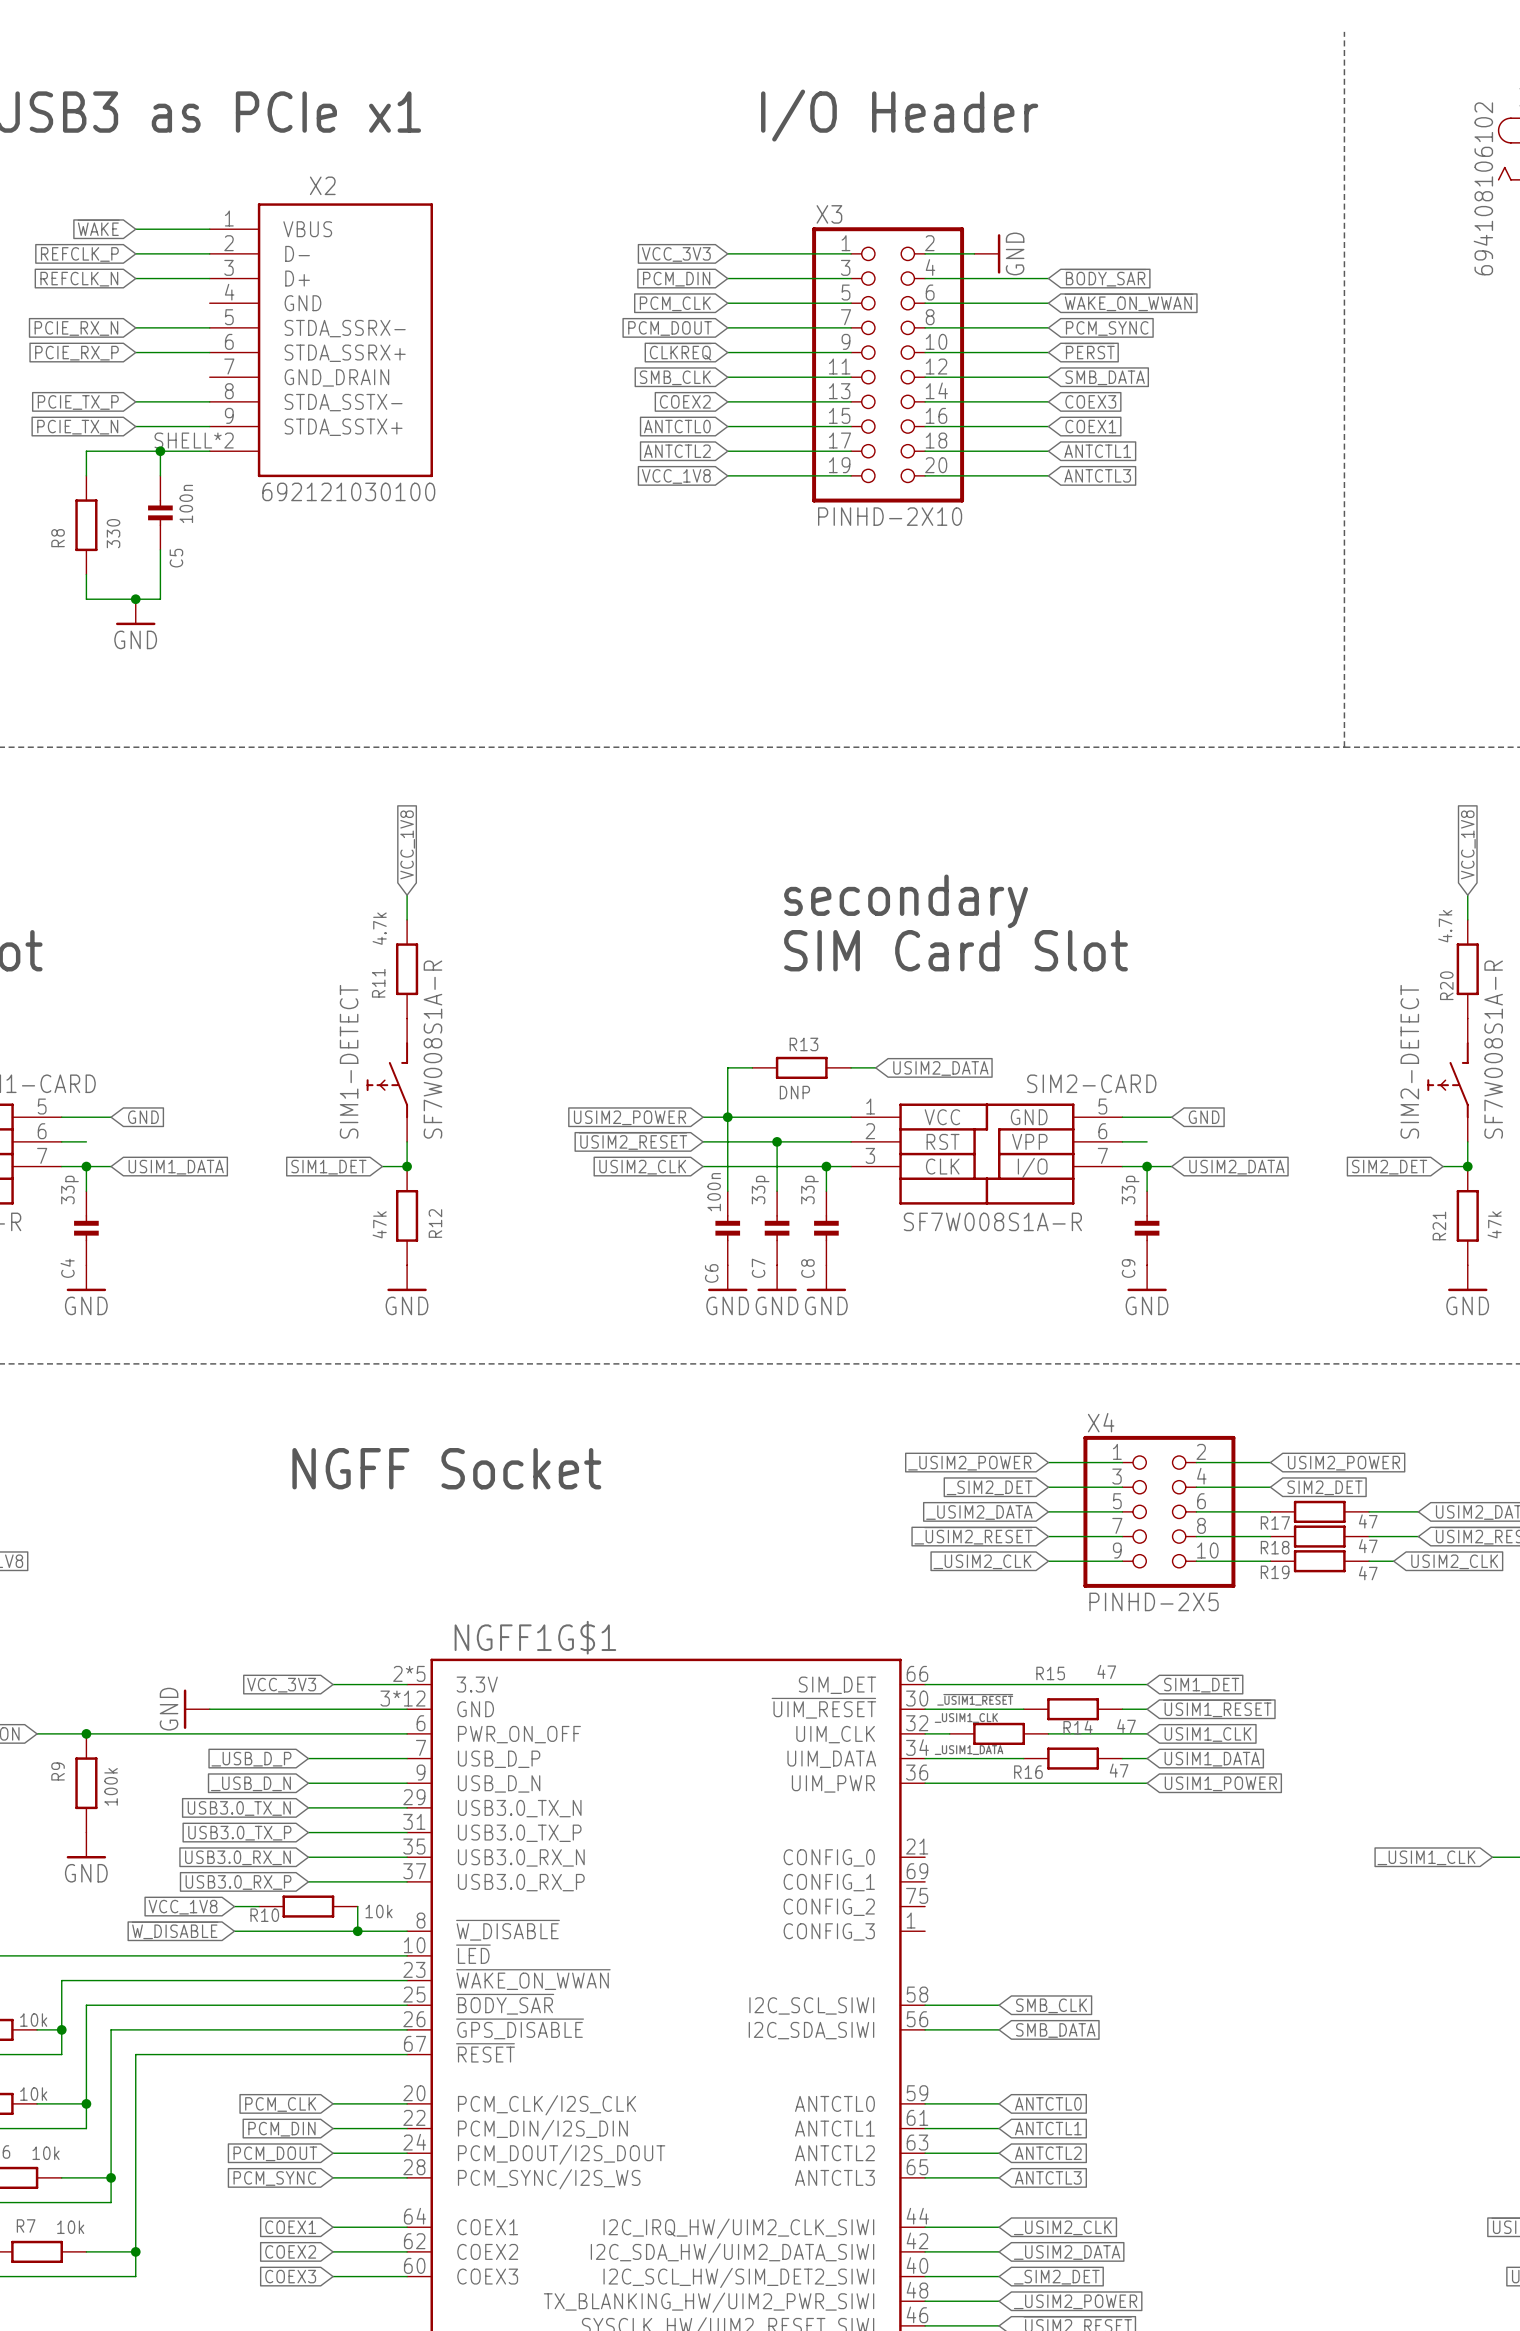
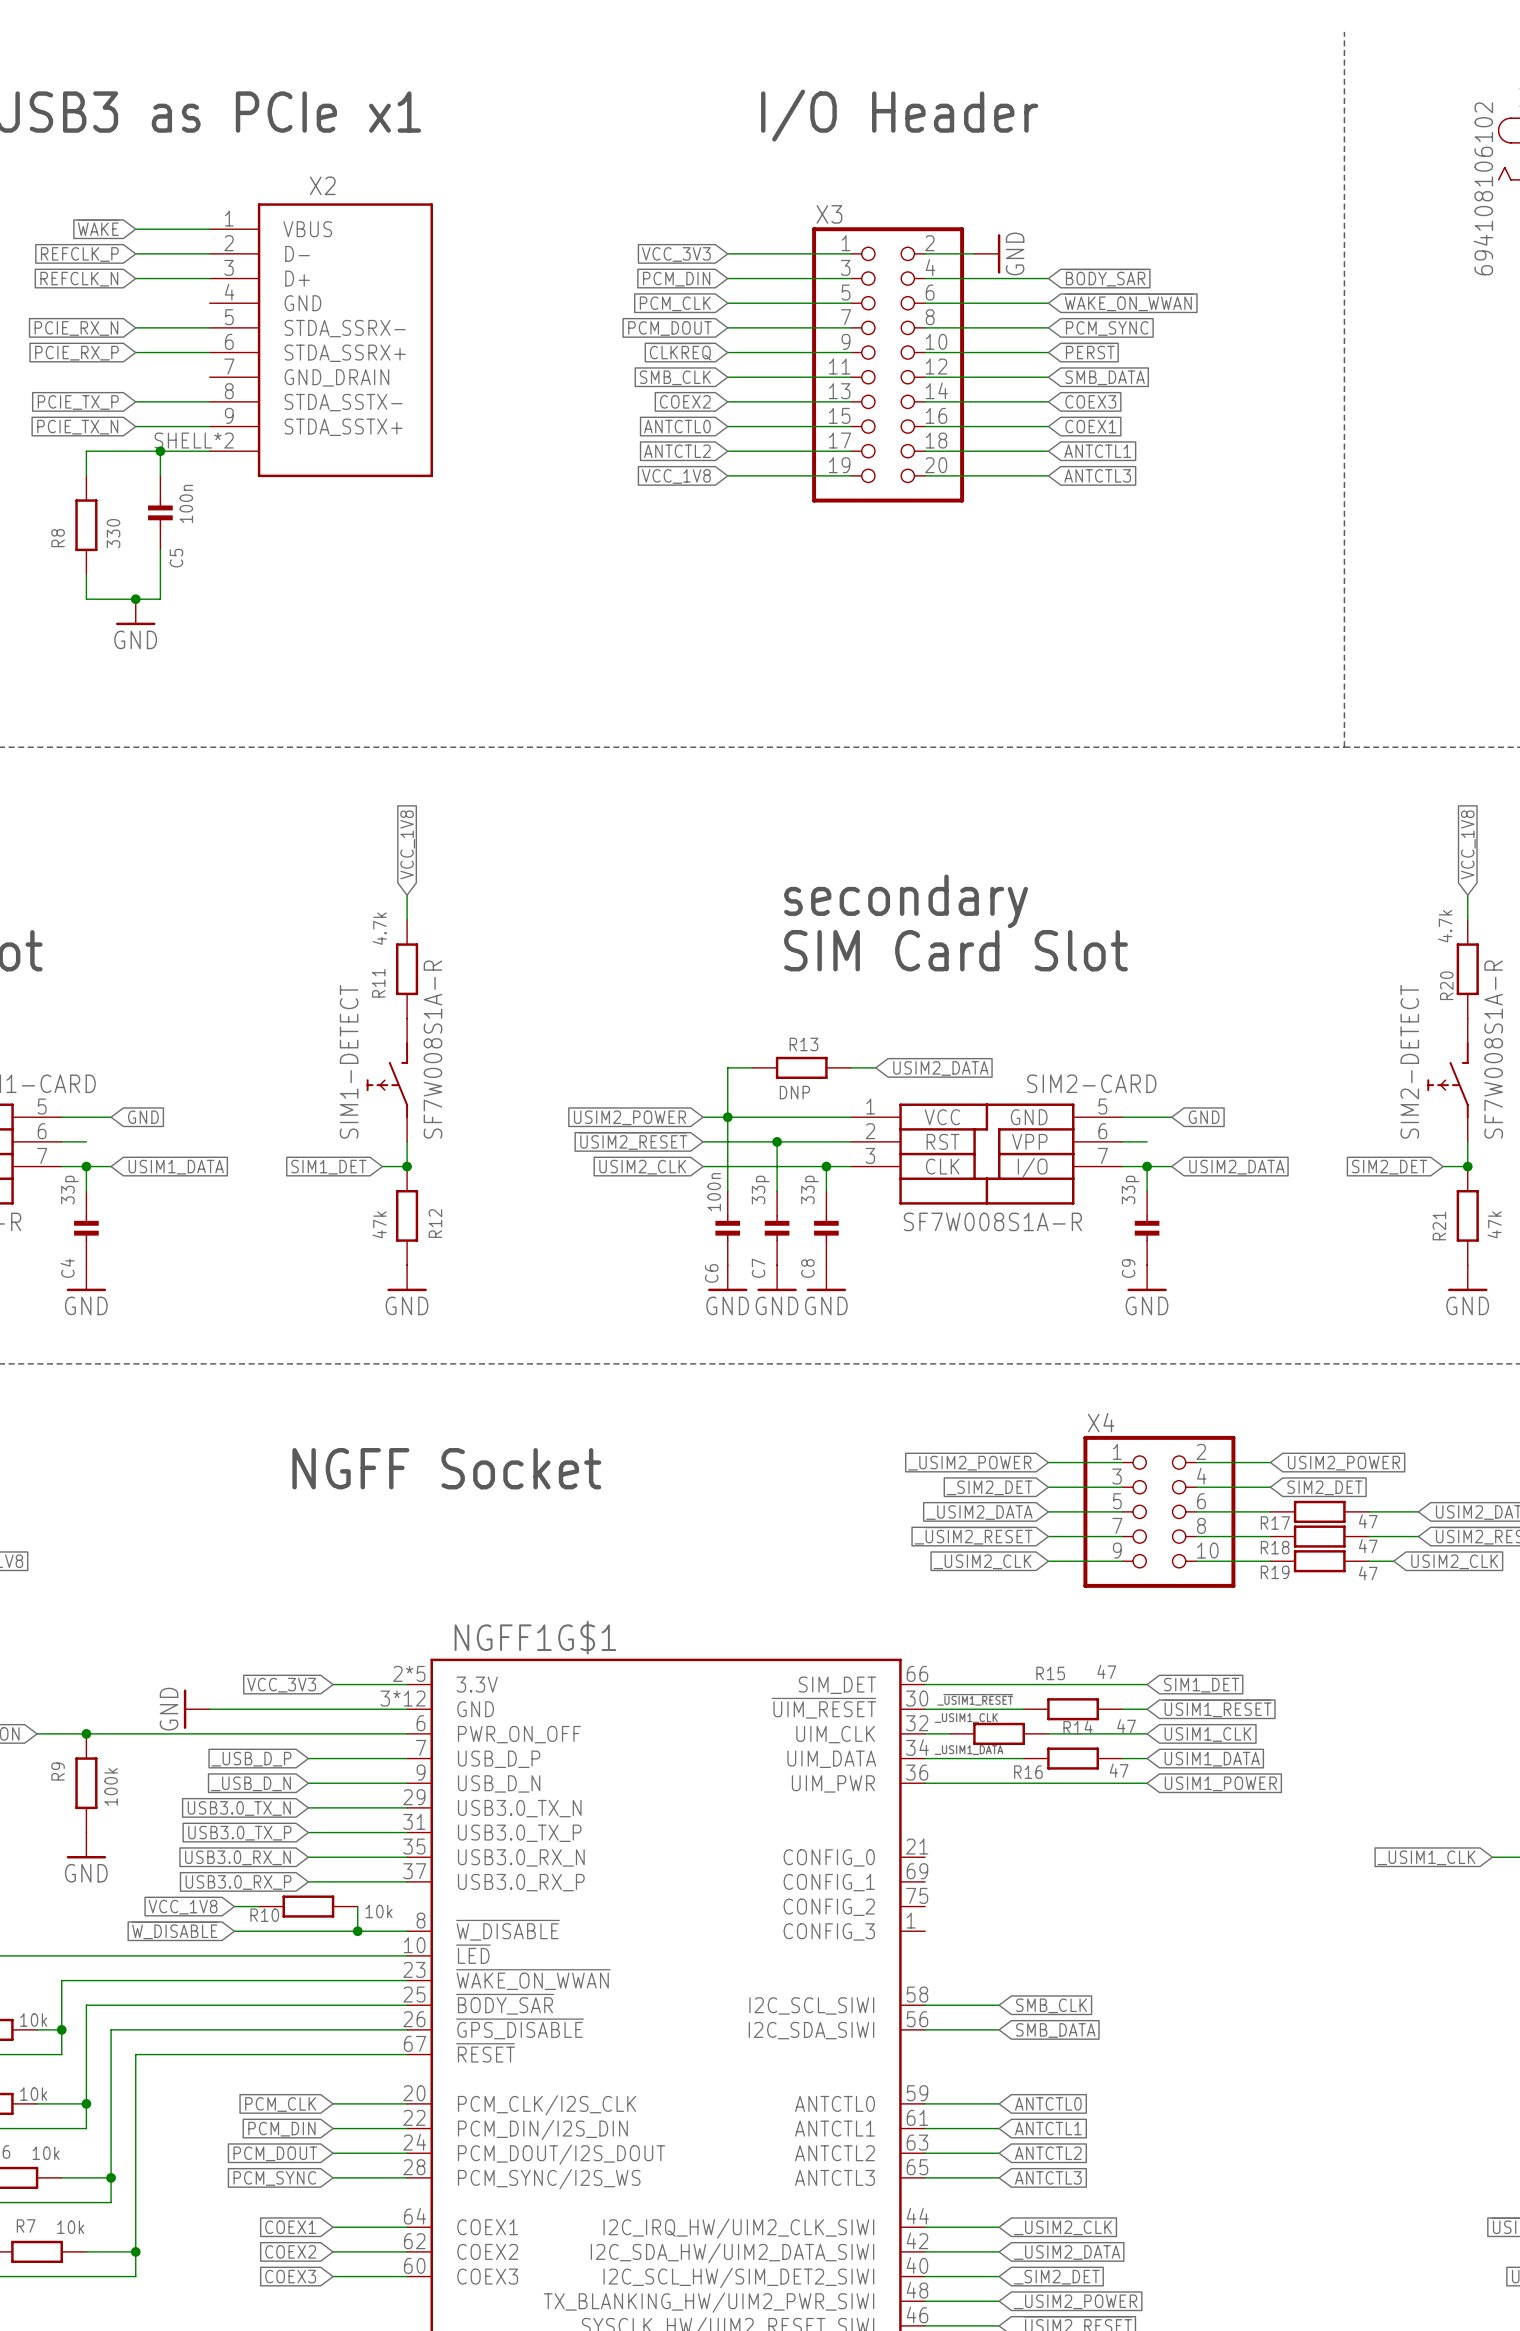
X2 value: 692121030100 (348, 491) -> none
X3 value: PINHD-2X10 (890, 516) -> none
X4 value: PINHD-2X5 (1154, 1601) -> none

